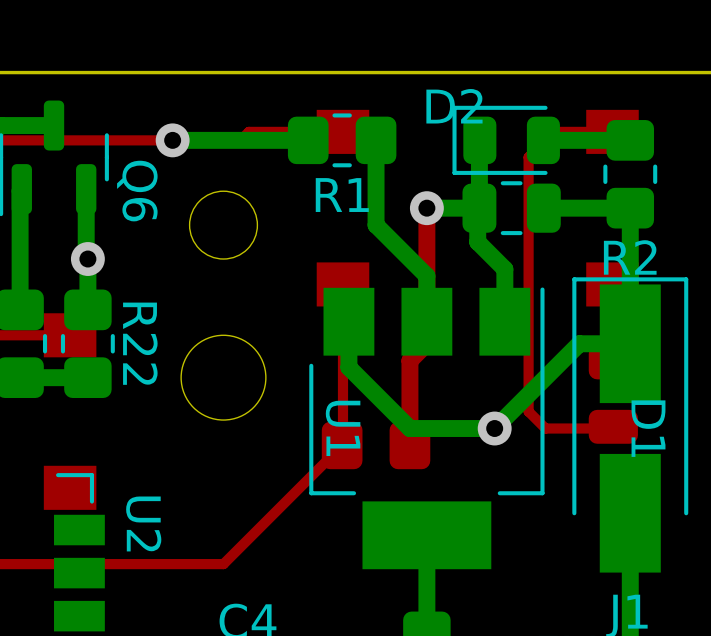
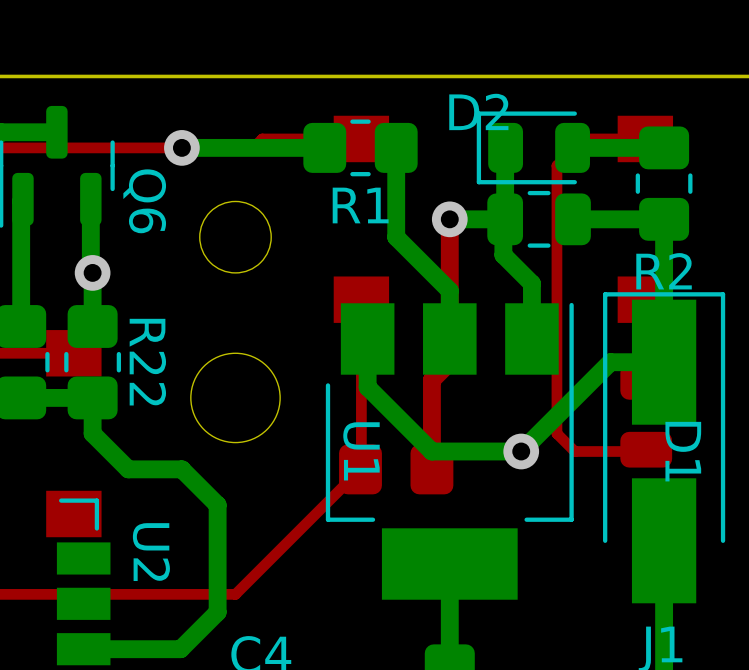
bottom track: none -> (92, 397) (92, 433) (128, 469) (181, 469) (217, 505) (217, 612) (180, 649) (83, 649)

